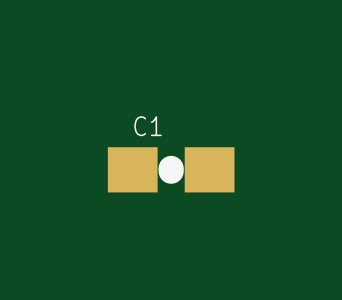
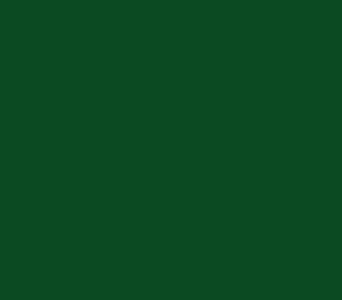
C1: (171, 169) -> none

